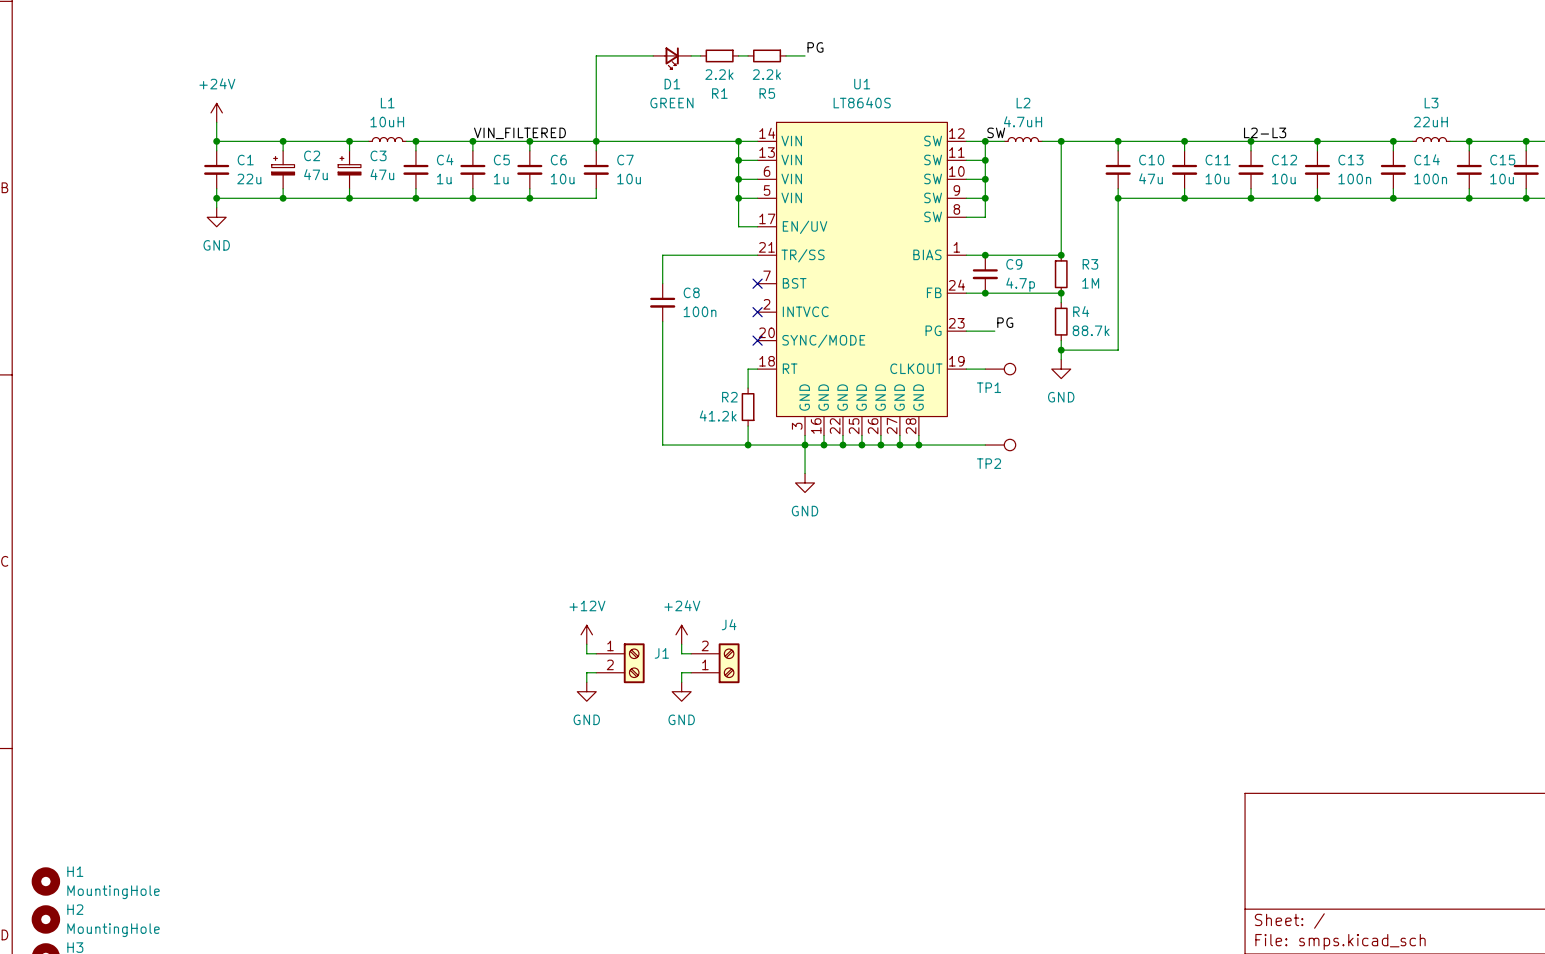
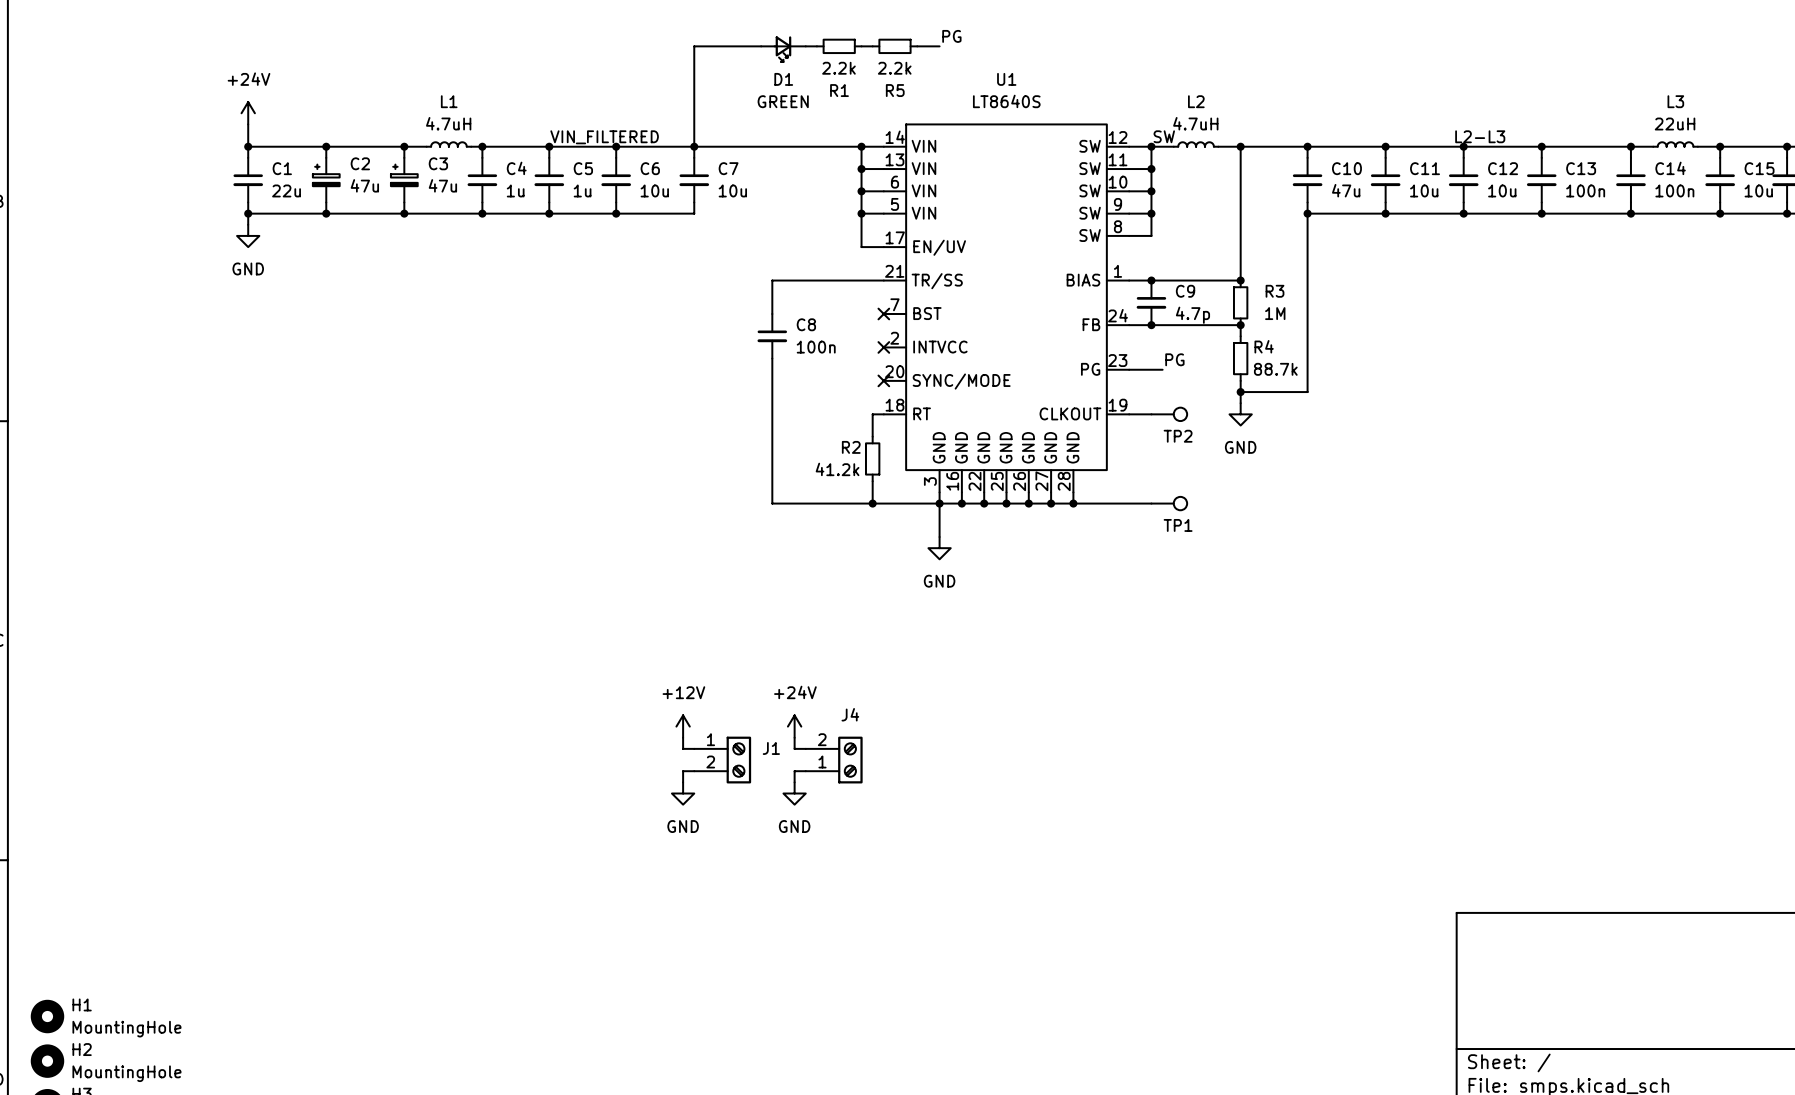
L1 value: 10uH (387, 122) -> 4.7uH (448, 123)
TP1 name: TP1 (989, 387) -> TP2 (1178, 436)
TP2 name: TP2 (989, 463) -> TP1 (1178, 525)

